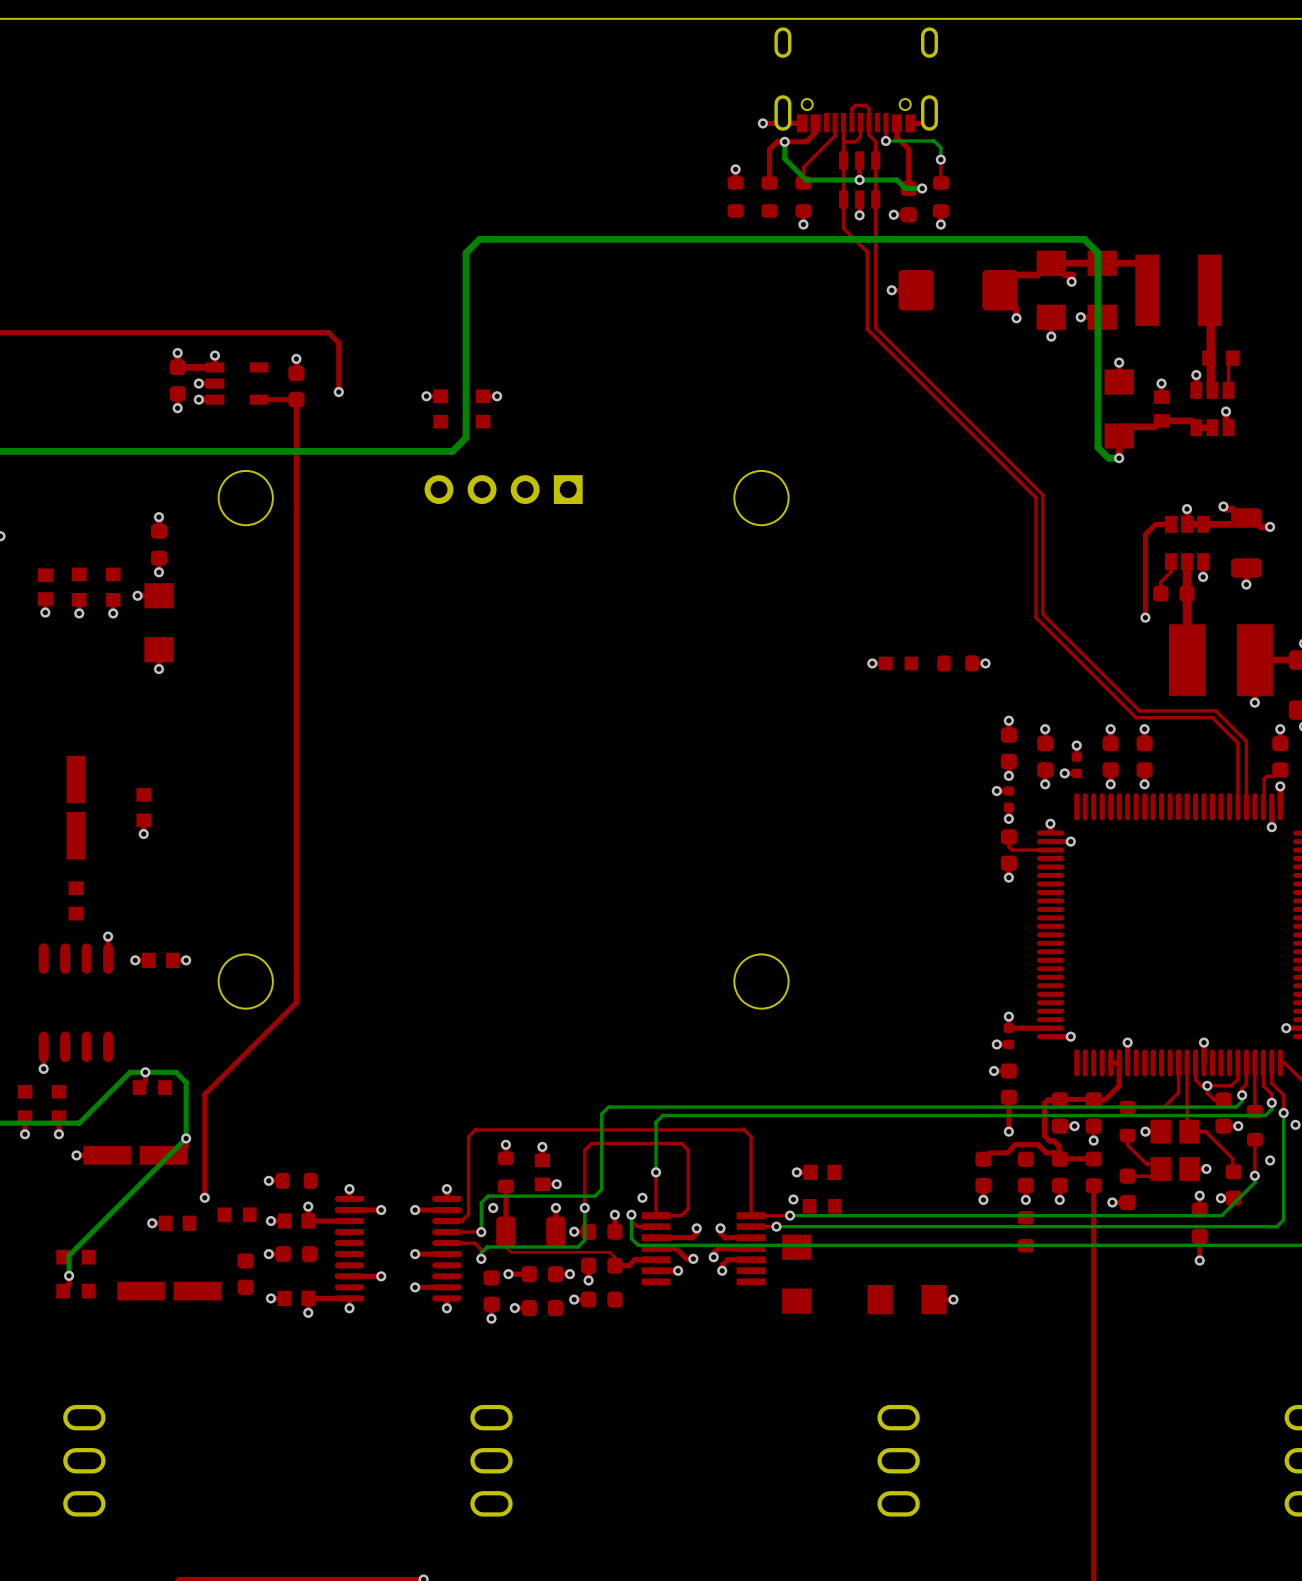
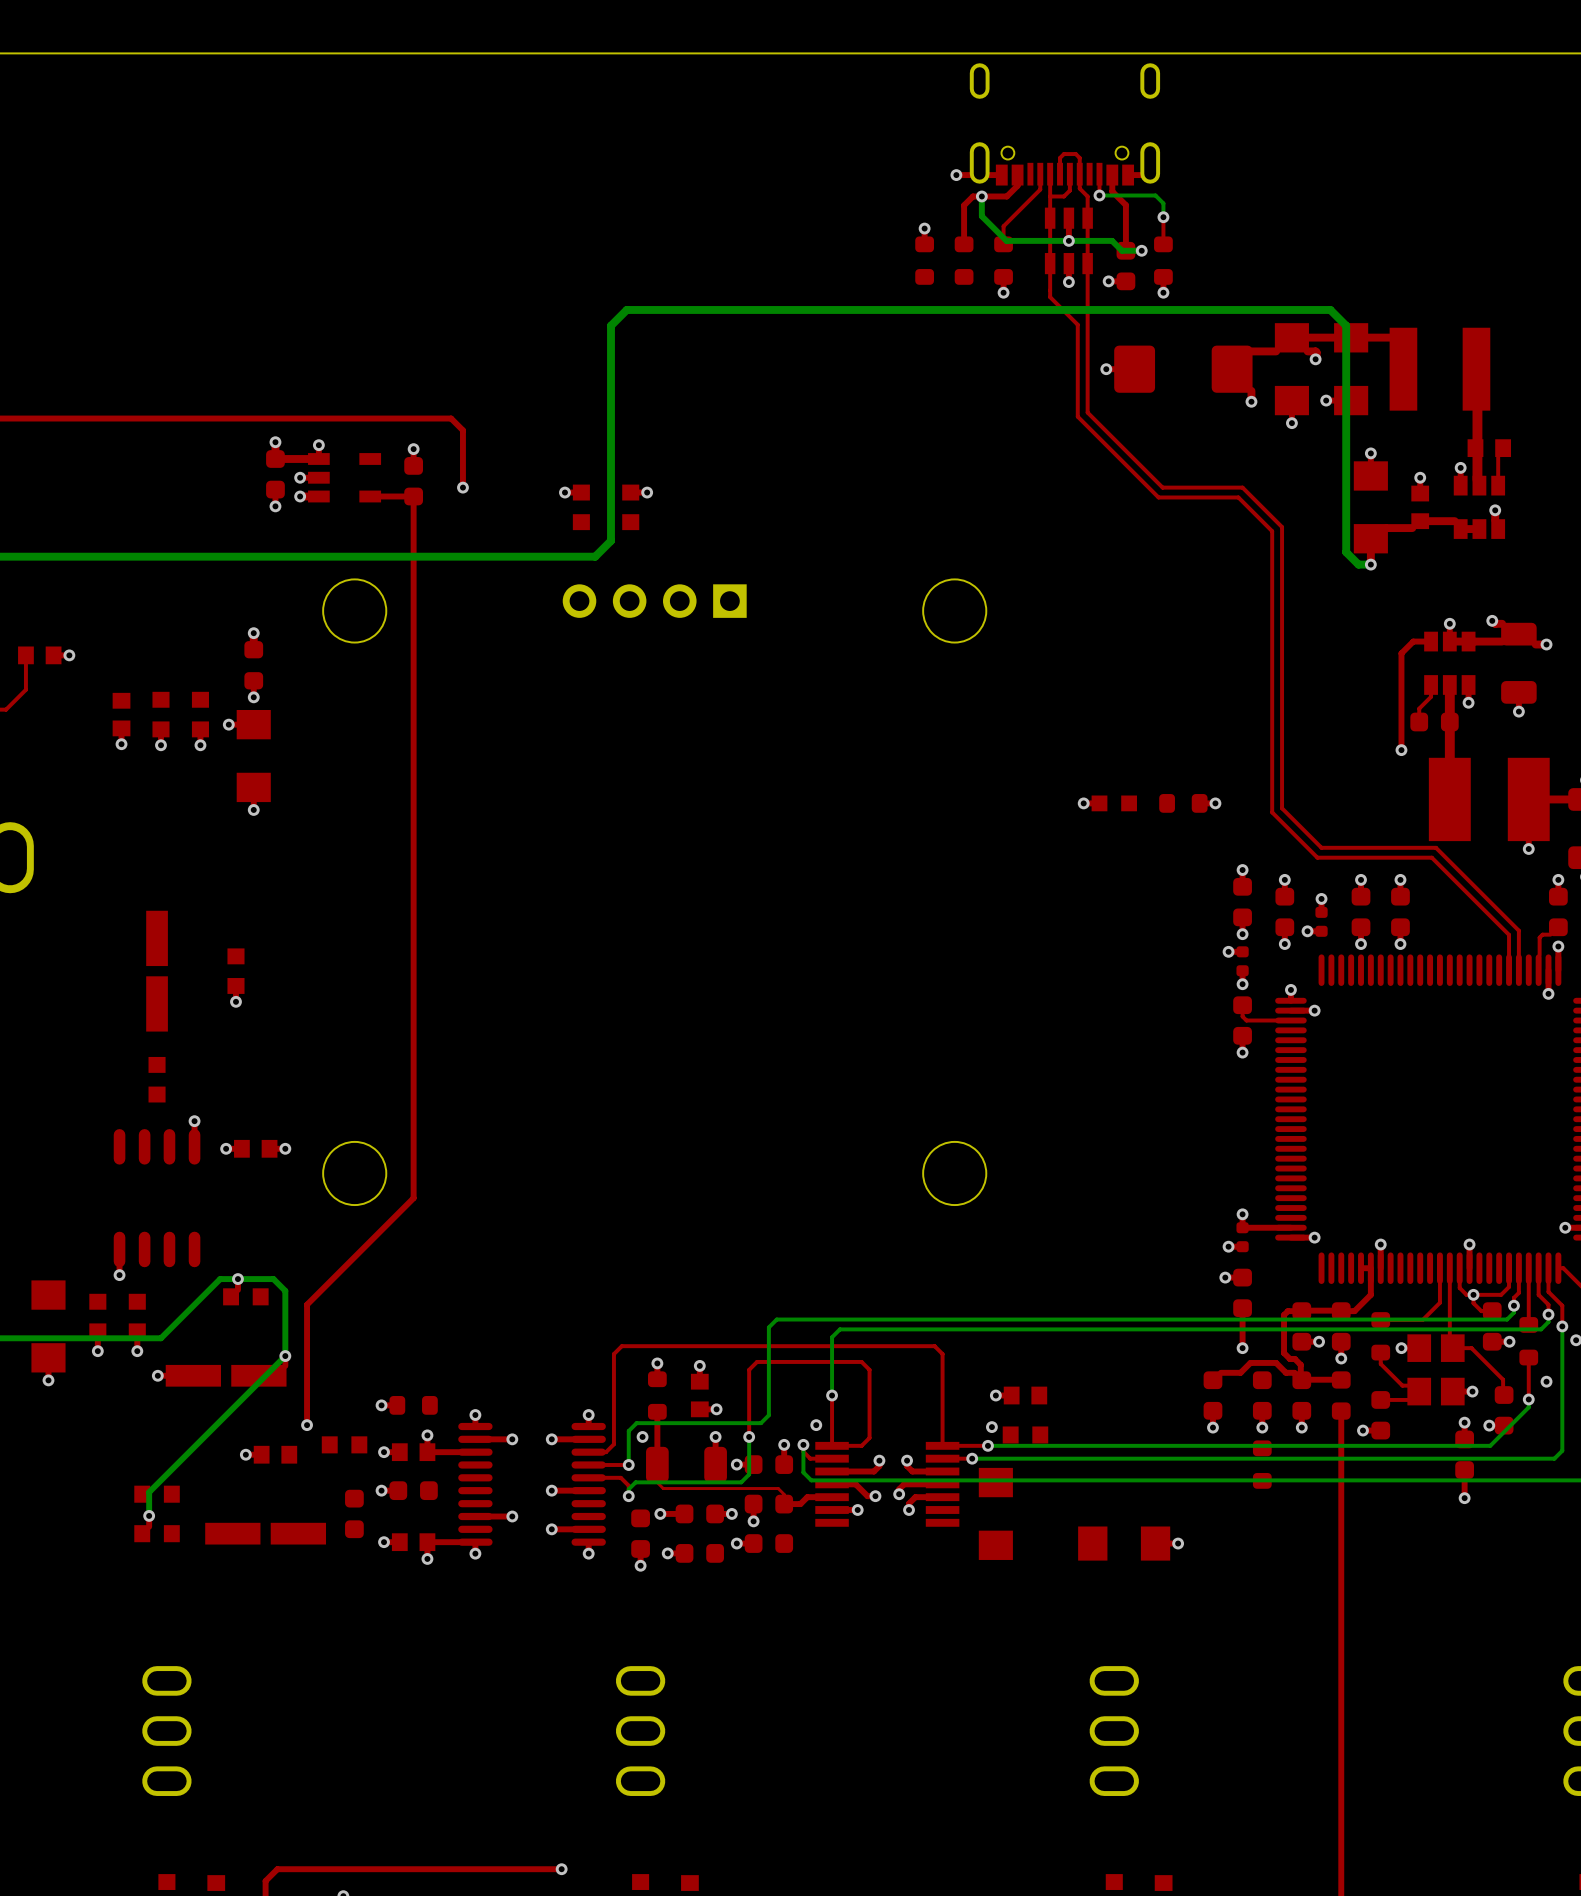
top track: (875, 327) (1042, 495) -> (1087, 412) (1162, 487) (1242, 487) (1282, 527) (1282, 607)
top track: (867, 329) (1036, 497) (1036, 617) (1136, 717) (1212, 717) (1237, 743) (1237, 776) -> (1077, 414) (1077, 416) (1158, 497) (1238, 497) (1272, 531) (1272, 812) (1317, 857) (1431, 857) (1509, 934)
top track: (1042, 614) (1139, 710) (1215, 710) (1246, 741) (1246, 772) -> (1282, 746) (1282, 808) (1321, 847) (1436, 847) (1518, 930)

